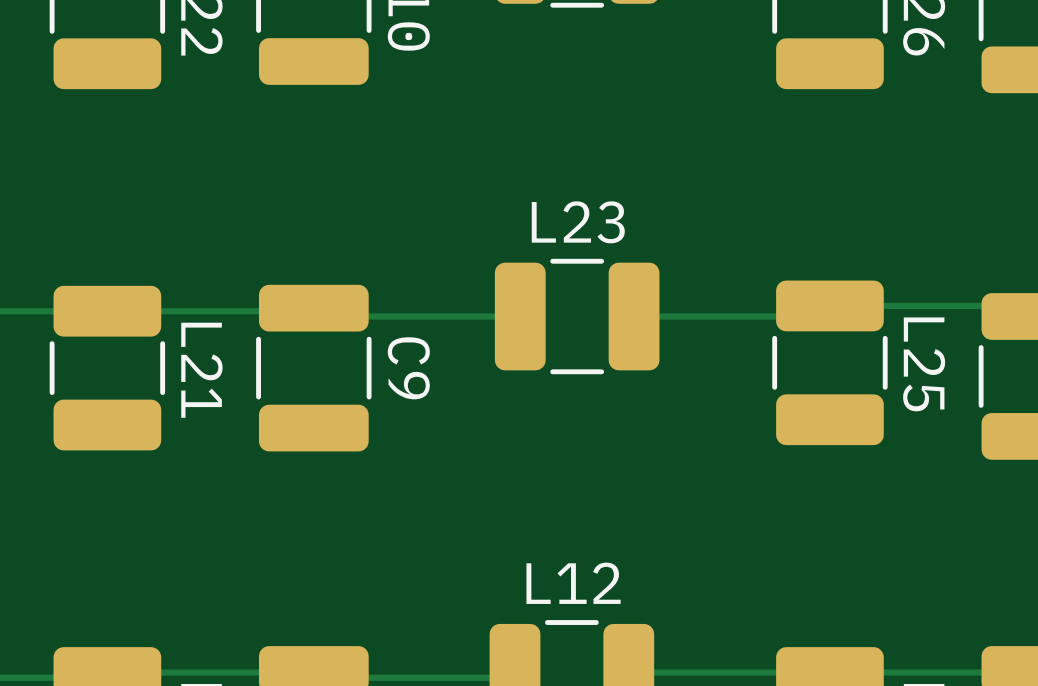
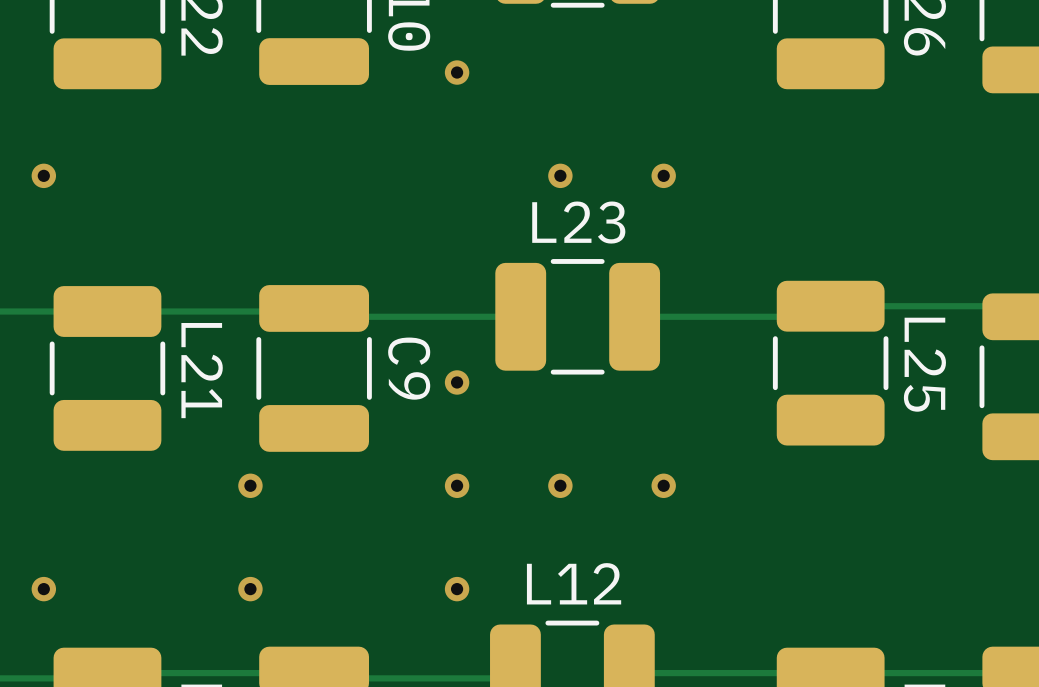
via: none -> (457, 72)
via: none -> (43, 175)
via: none -> (560, 175)
via: none -> (663, 175)
via: none -> (457, 382)
via: none -> (250, 485)
via: none -> (457, 485)
via: none -> (560, 485)
via: none -> (663, 485)
via: none -> (43, 589)
via: none -> (250, 589)
via: none -> (457, 589)

